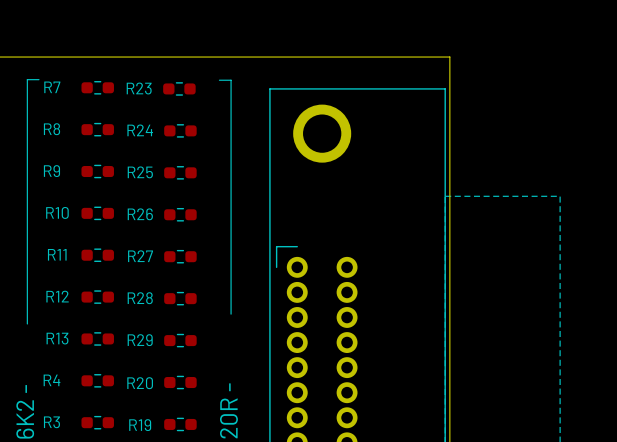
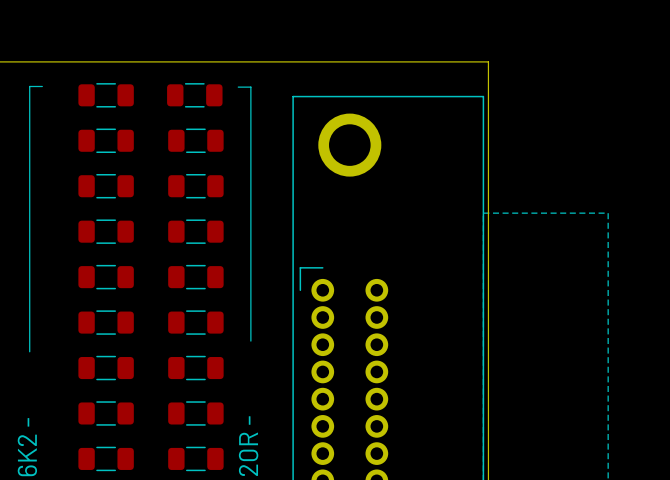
R7: (97, 87) -> none
part: none -> (106, 95)
part: none -> (194, 95)
R23: (179, 88) -> none
R8: (97, 129) -> none
part: none -> (106, 140)
part: none -> (195, 140)
R24: (180, 130) -> none
R9: (97, 171) -> none
part: none -> (106, 186)
part: none -> (195, 186)
R25: (180, 172) -> none
R10: (97, 213) -> none
part: none -> (106, 231)
part: none -> (195, 231)
R26: (180, 214) -> none
R11: (97, 255) -> none
part: none -> (106, 277)
part: none -> (195, 277)
R27: (180, 256) -> none
R12: (97, 297) -> none
part: none -> (106, 322)
part: none -> (195, 322)
R28: (180, 298) -> none
R13: (97, 338) -> none
part: none -> (106, 368)
part: none -> (195, 368)
R29: (180, 340) -> none
R4: (97, 380) -> none
part: none -> (106, 413)
part: none -> (195, 413)
R20: (180, 382) -> none
R3: (97, 422) -> none
part: none -> (106, 458)
part: none -> (195, 458)
R19: (180, 424) -> none

